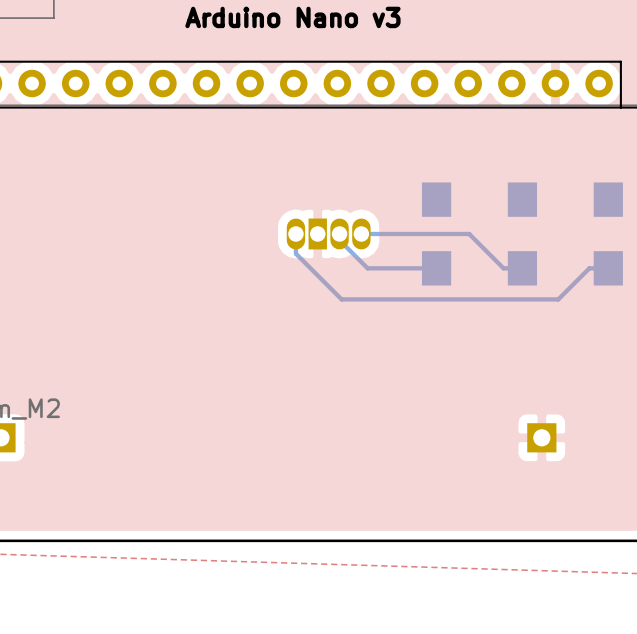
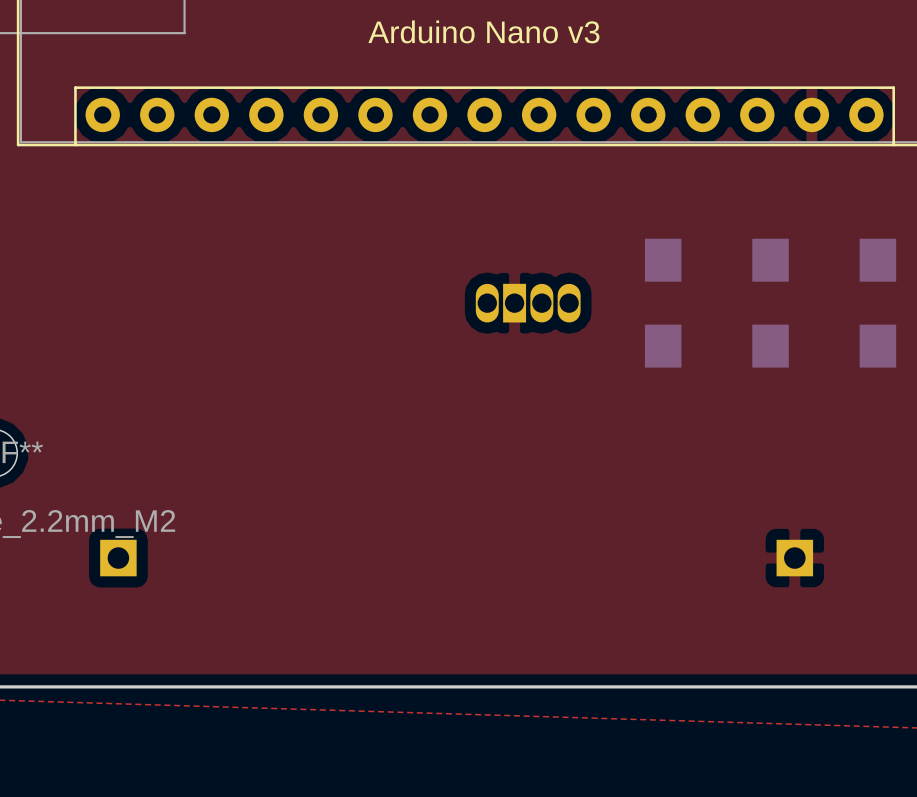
bottom track: (295, 233) (295, 253) (341, 299) (558, 299) (589, 268) (608, 268) -> none
bottom track: (339, 233) (339, 240) (367, 268) (436, 268) -> none
bottom track: (361, 233) (469, 233) (503, 268) (522, 268) -> none

